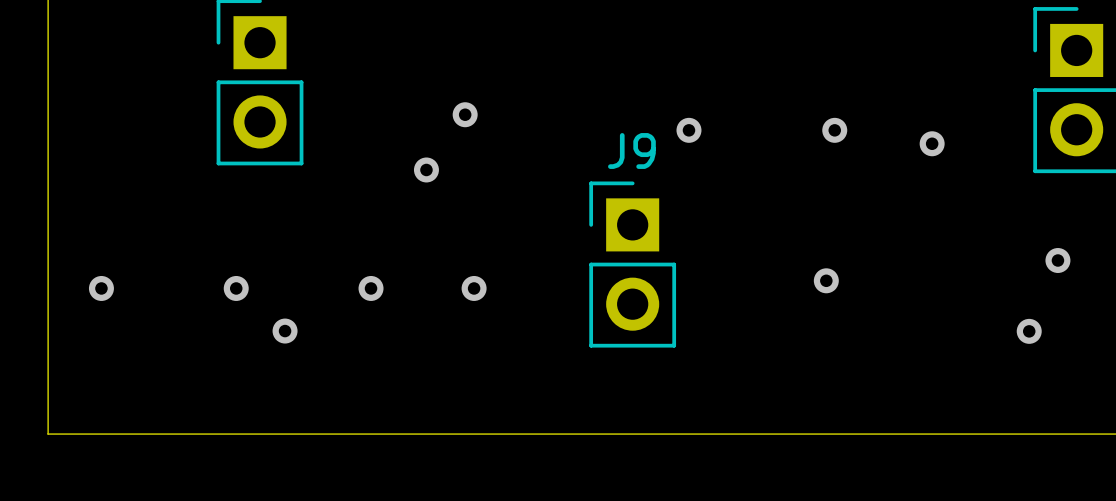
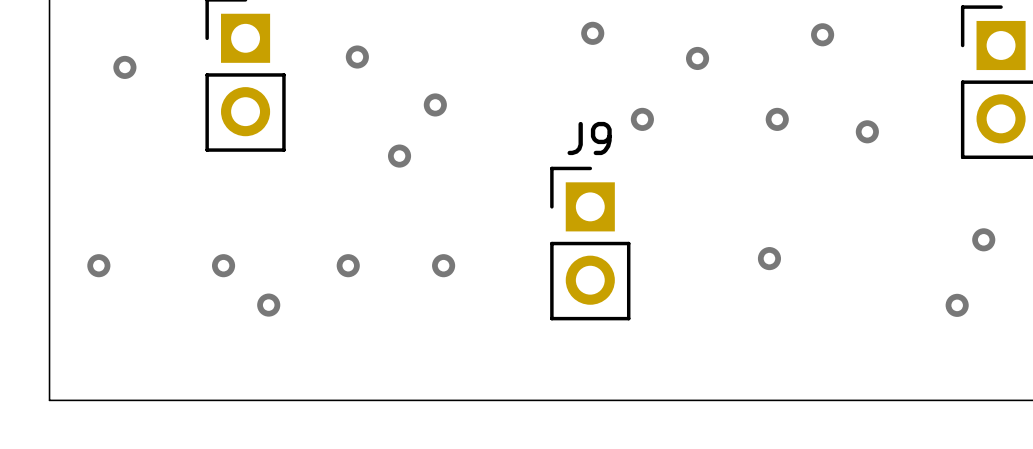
via: none -> (592, 33)
via: none -> (822, 34)
via: none -> (357, 57)
via: none -> (697, 58)
via: none -> (124, 67)

